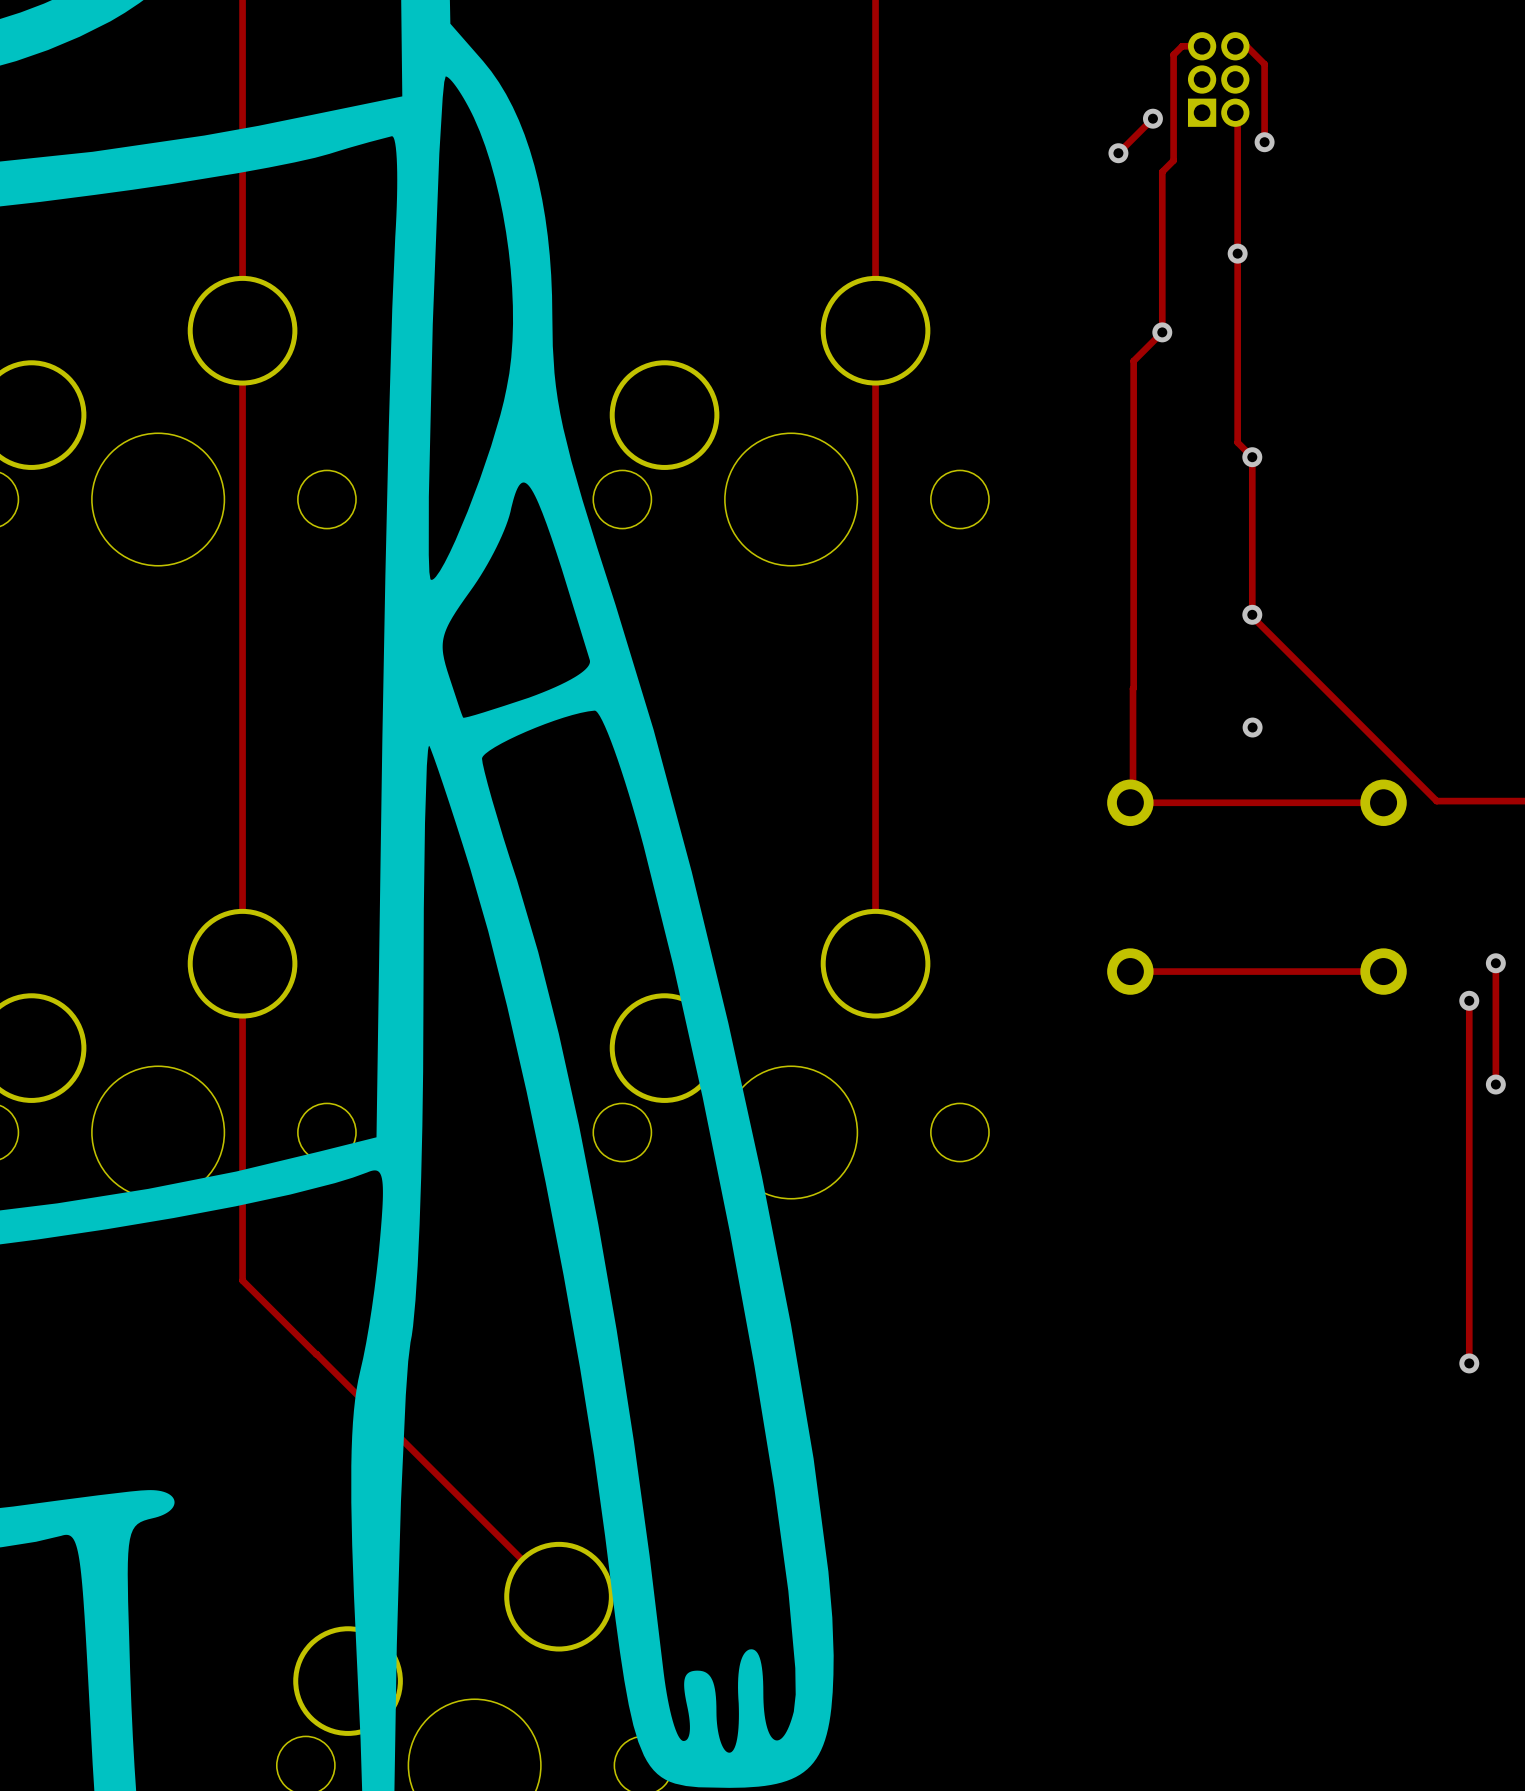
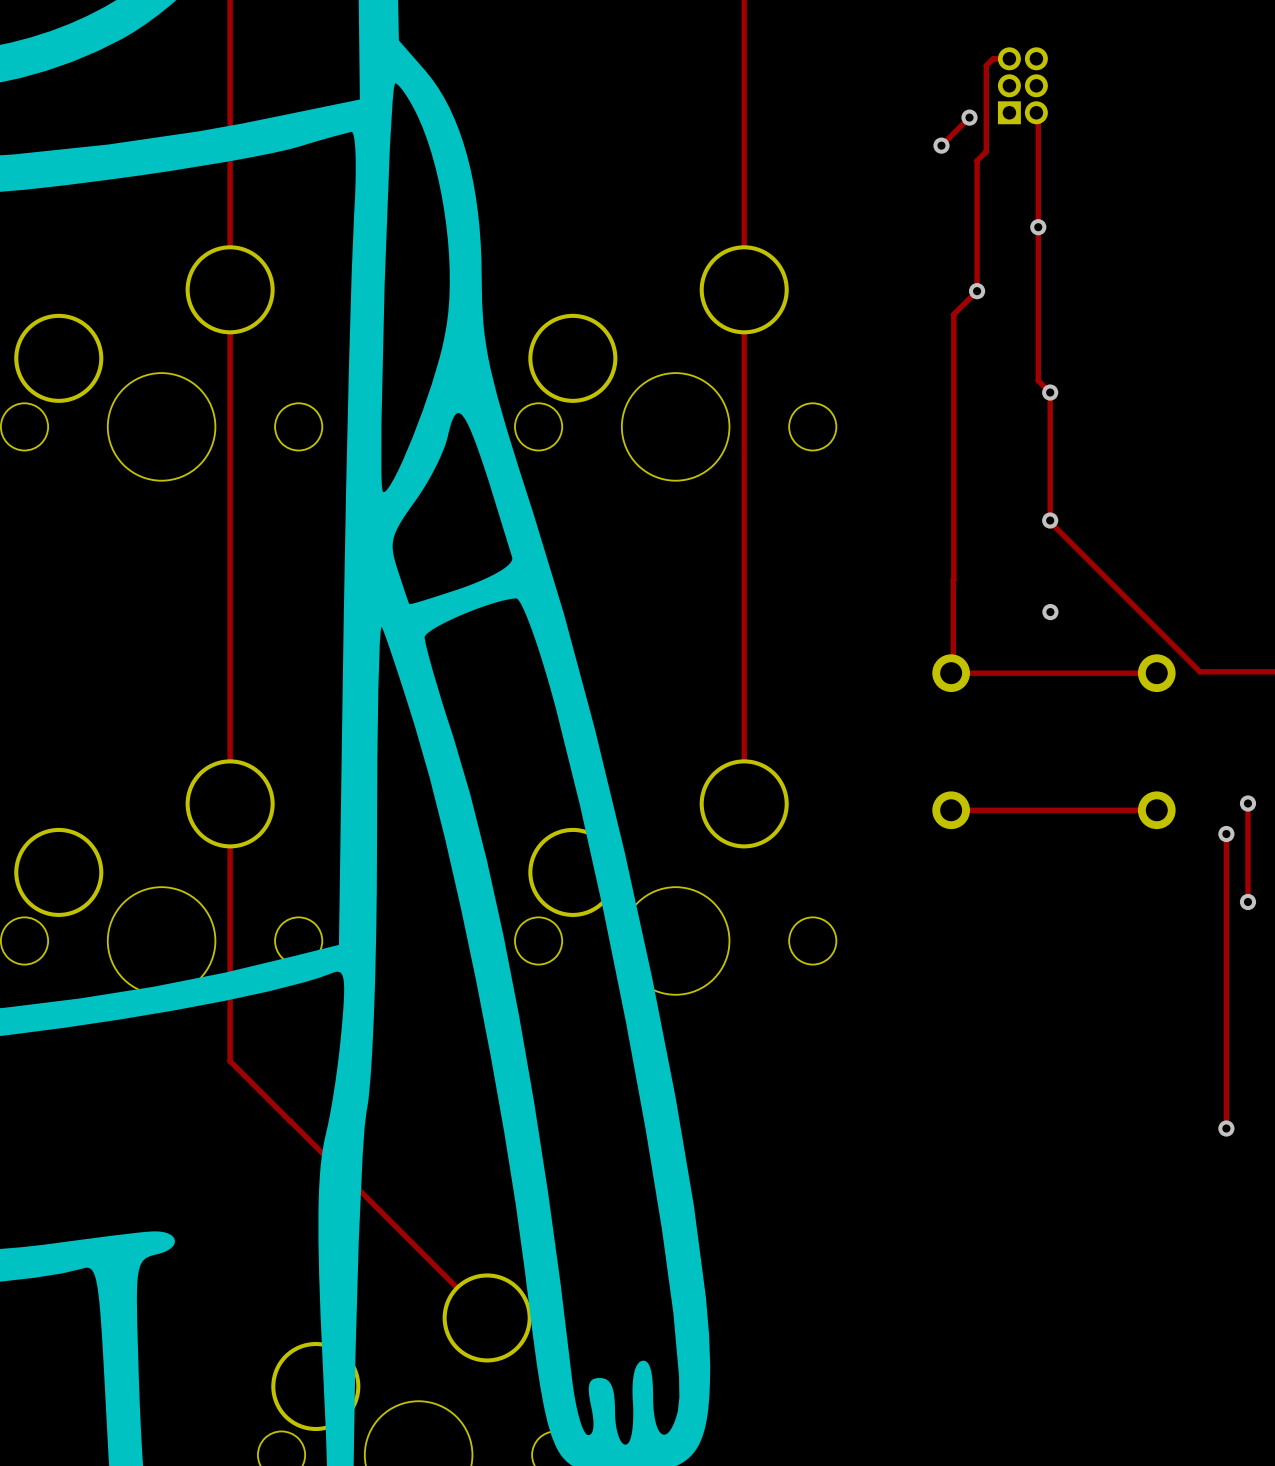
track: (1235, 46) (1246, 46) (1264, 64) (1264, 142) -> none
via: (1264, 142) -> none

